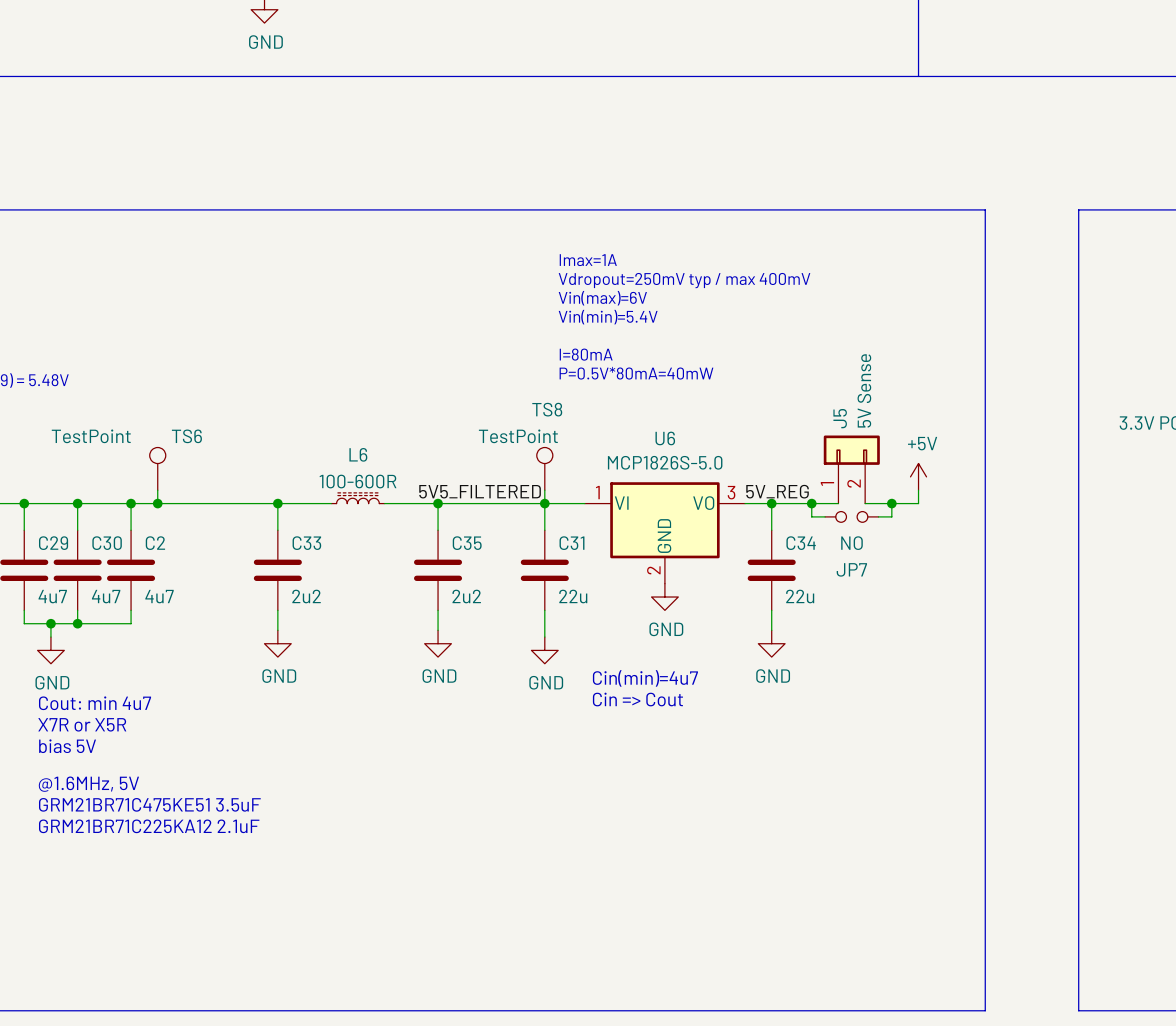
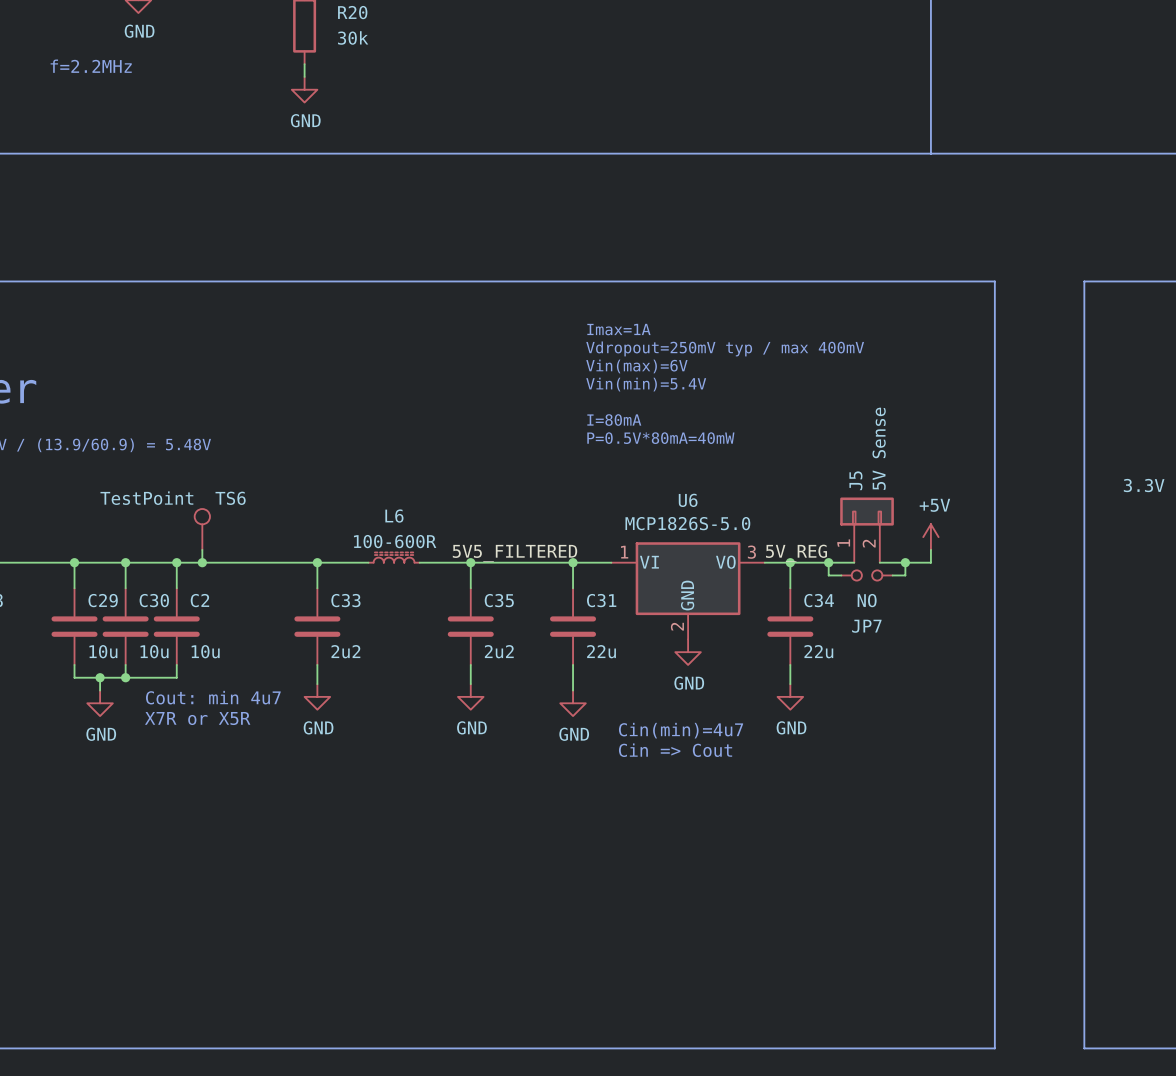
TS8: TestPoint (544, 468) -> none
wire: (544, 490) (544, 503) -> none
C29 value: 4u7 (52, 596) -> 10u (103, 651)
C30 value: 4u7 (106, 596) -> 10u (154, 651)
C2 value: 4u7 (159, 596) -> 10u (205, 651)
text position: Cout: min 4u7 (95, 703) -> Cout: min 4u7 (213, 697)
text position: X7R or X5R (82, 724) -> X7R or X5R (197, 718)
text: bias 5V (67, 746) -> none
text: @1.6MHz, 5V (88, 784) -> none
text: GRM21BR71C475KE51 3.5uF (149, 804) -> none
text: GRM21BR71C225KA12 2.1uF (149, 826) -> none

